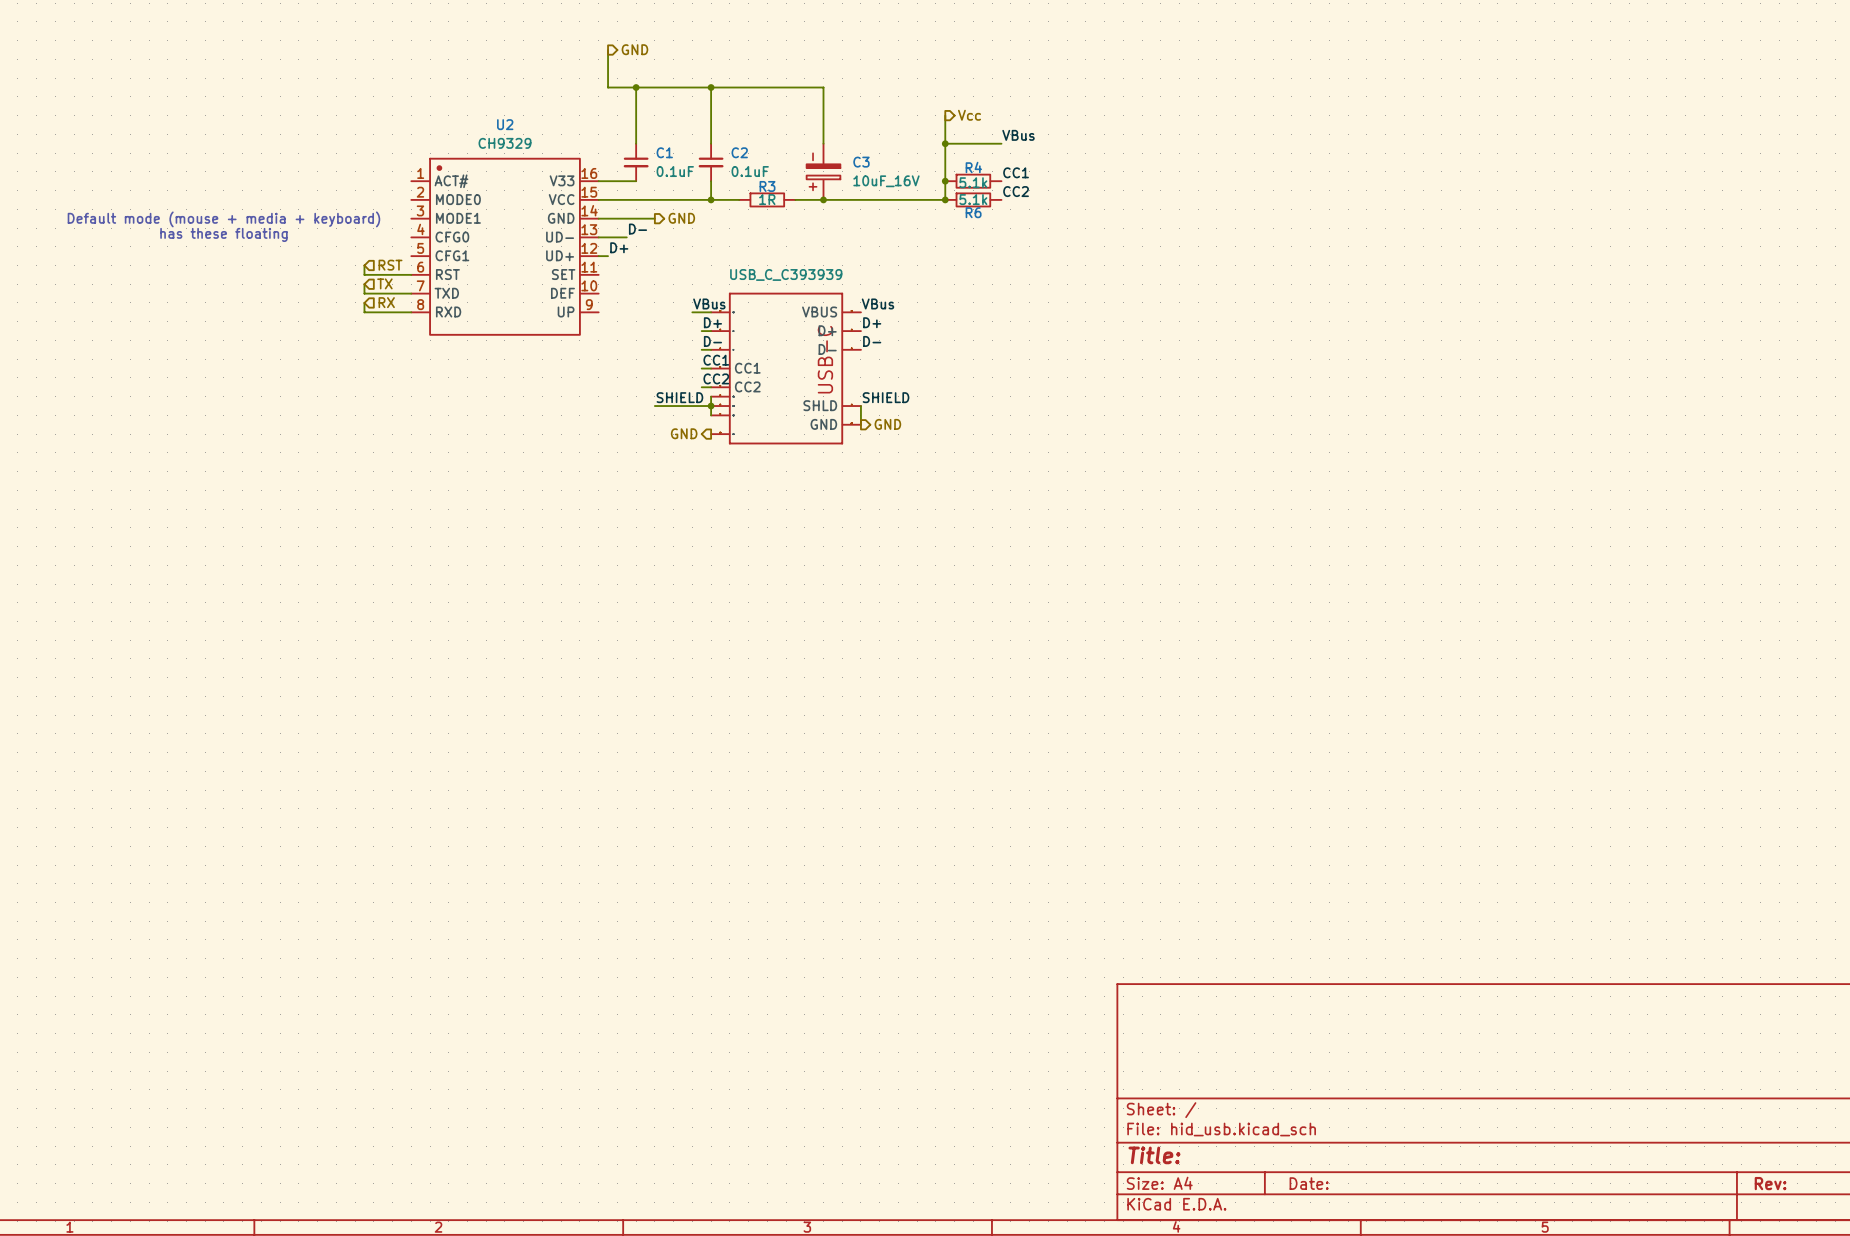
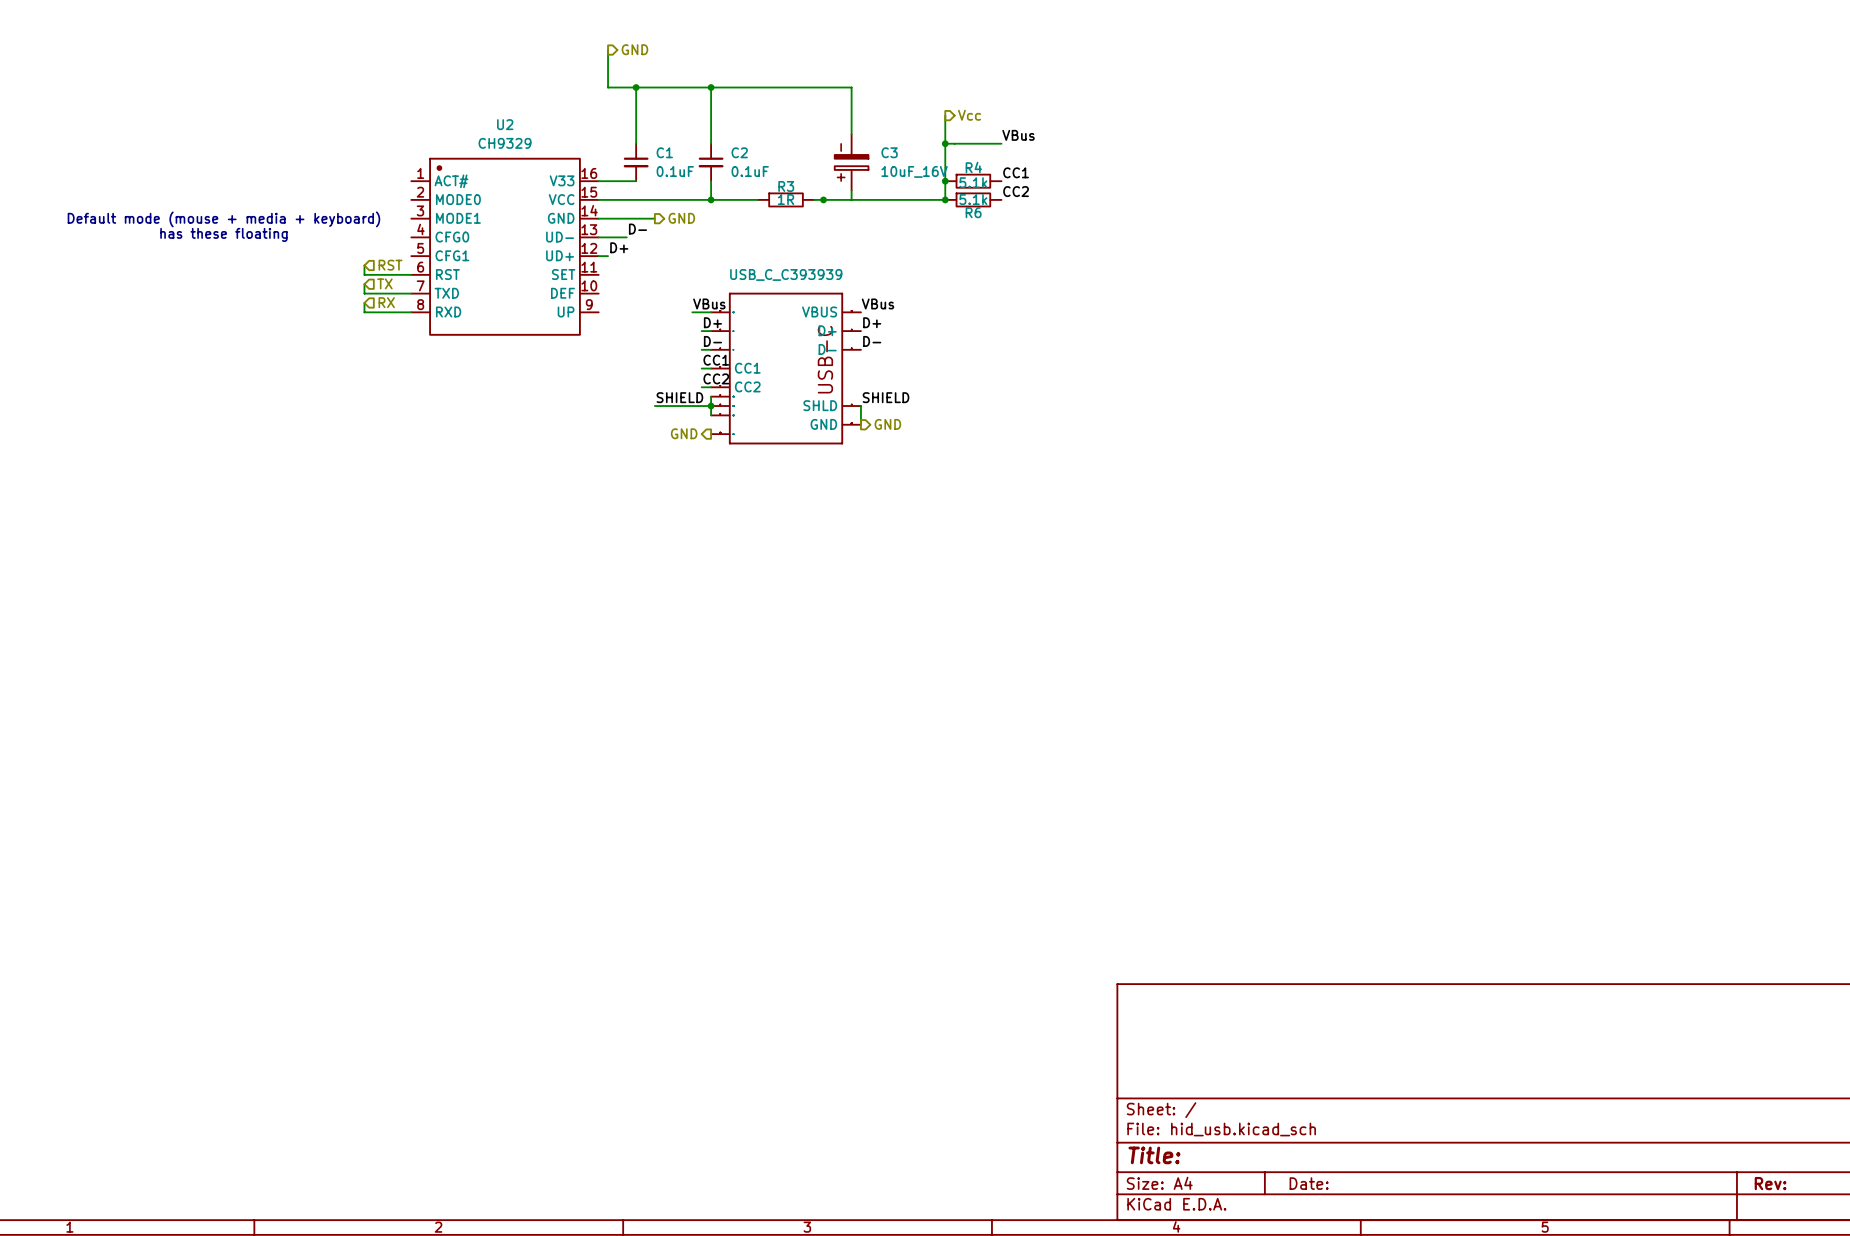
wire: (823, 87) (823, 143) -> (823, 87) (851, 87) (851, 134)
C3 position: (823, 171) -> (851, 162)
wire: none -> (851, 190) (851, 199)
R3 position: (767, 199) -> (786, 199)

